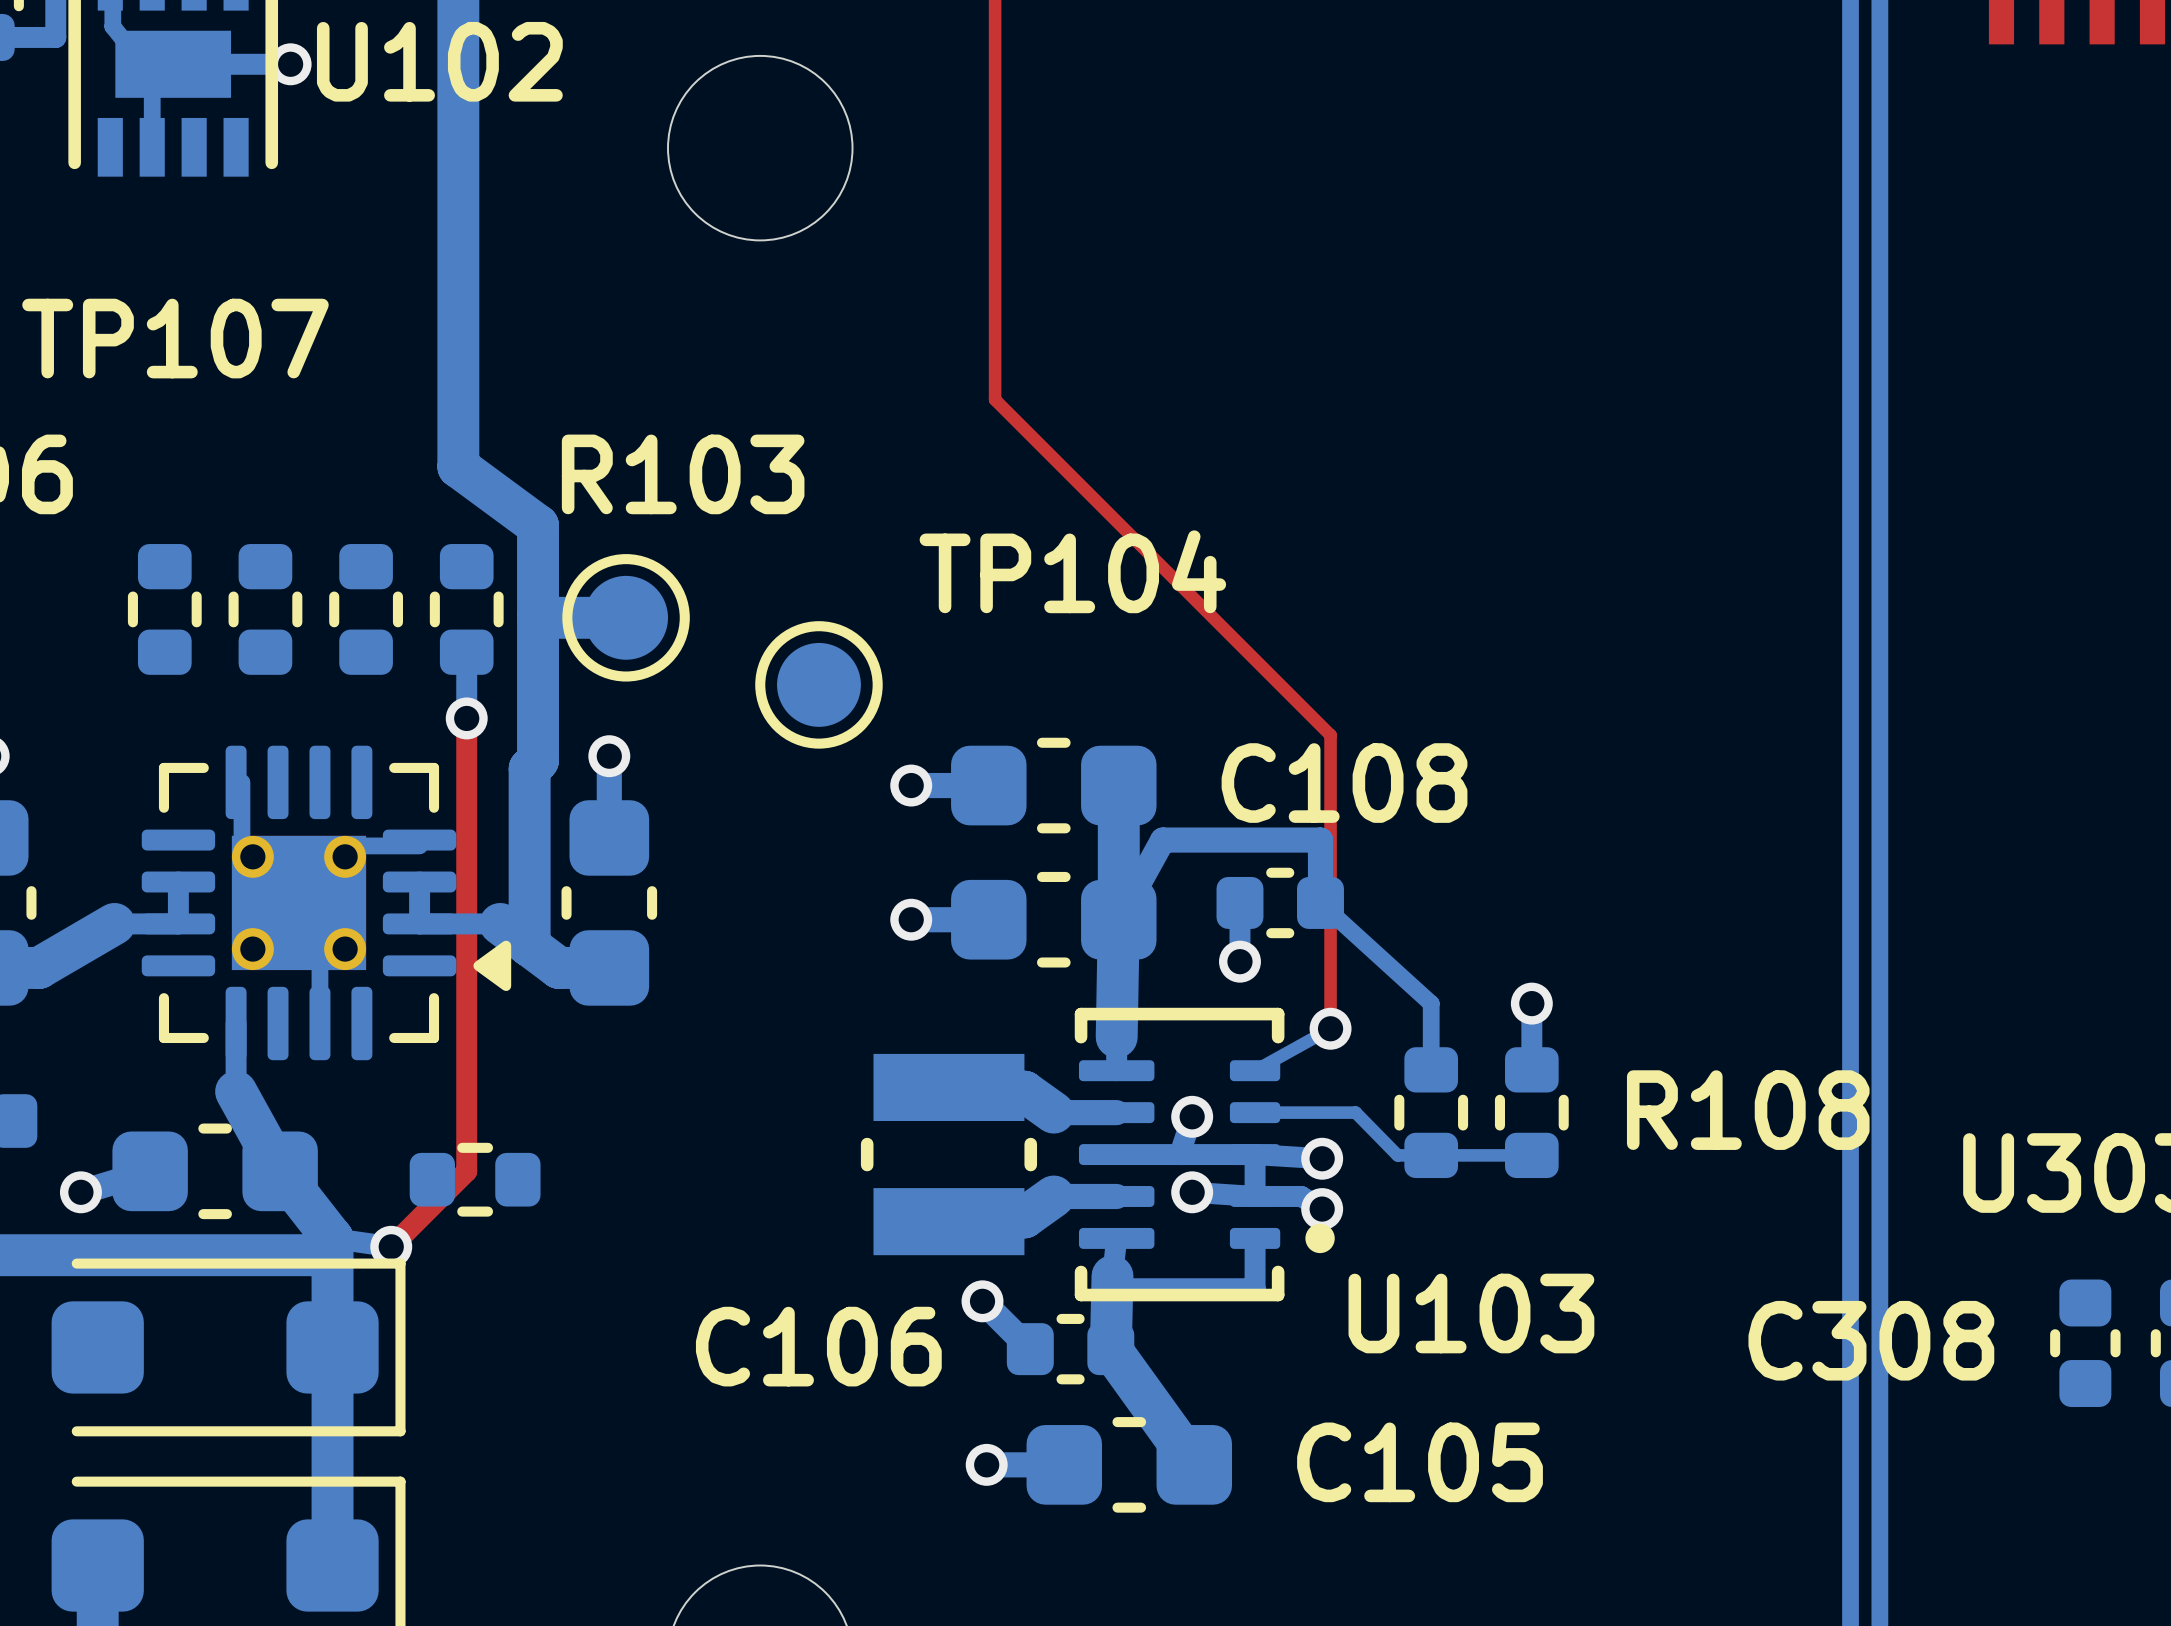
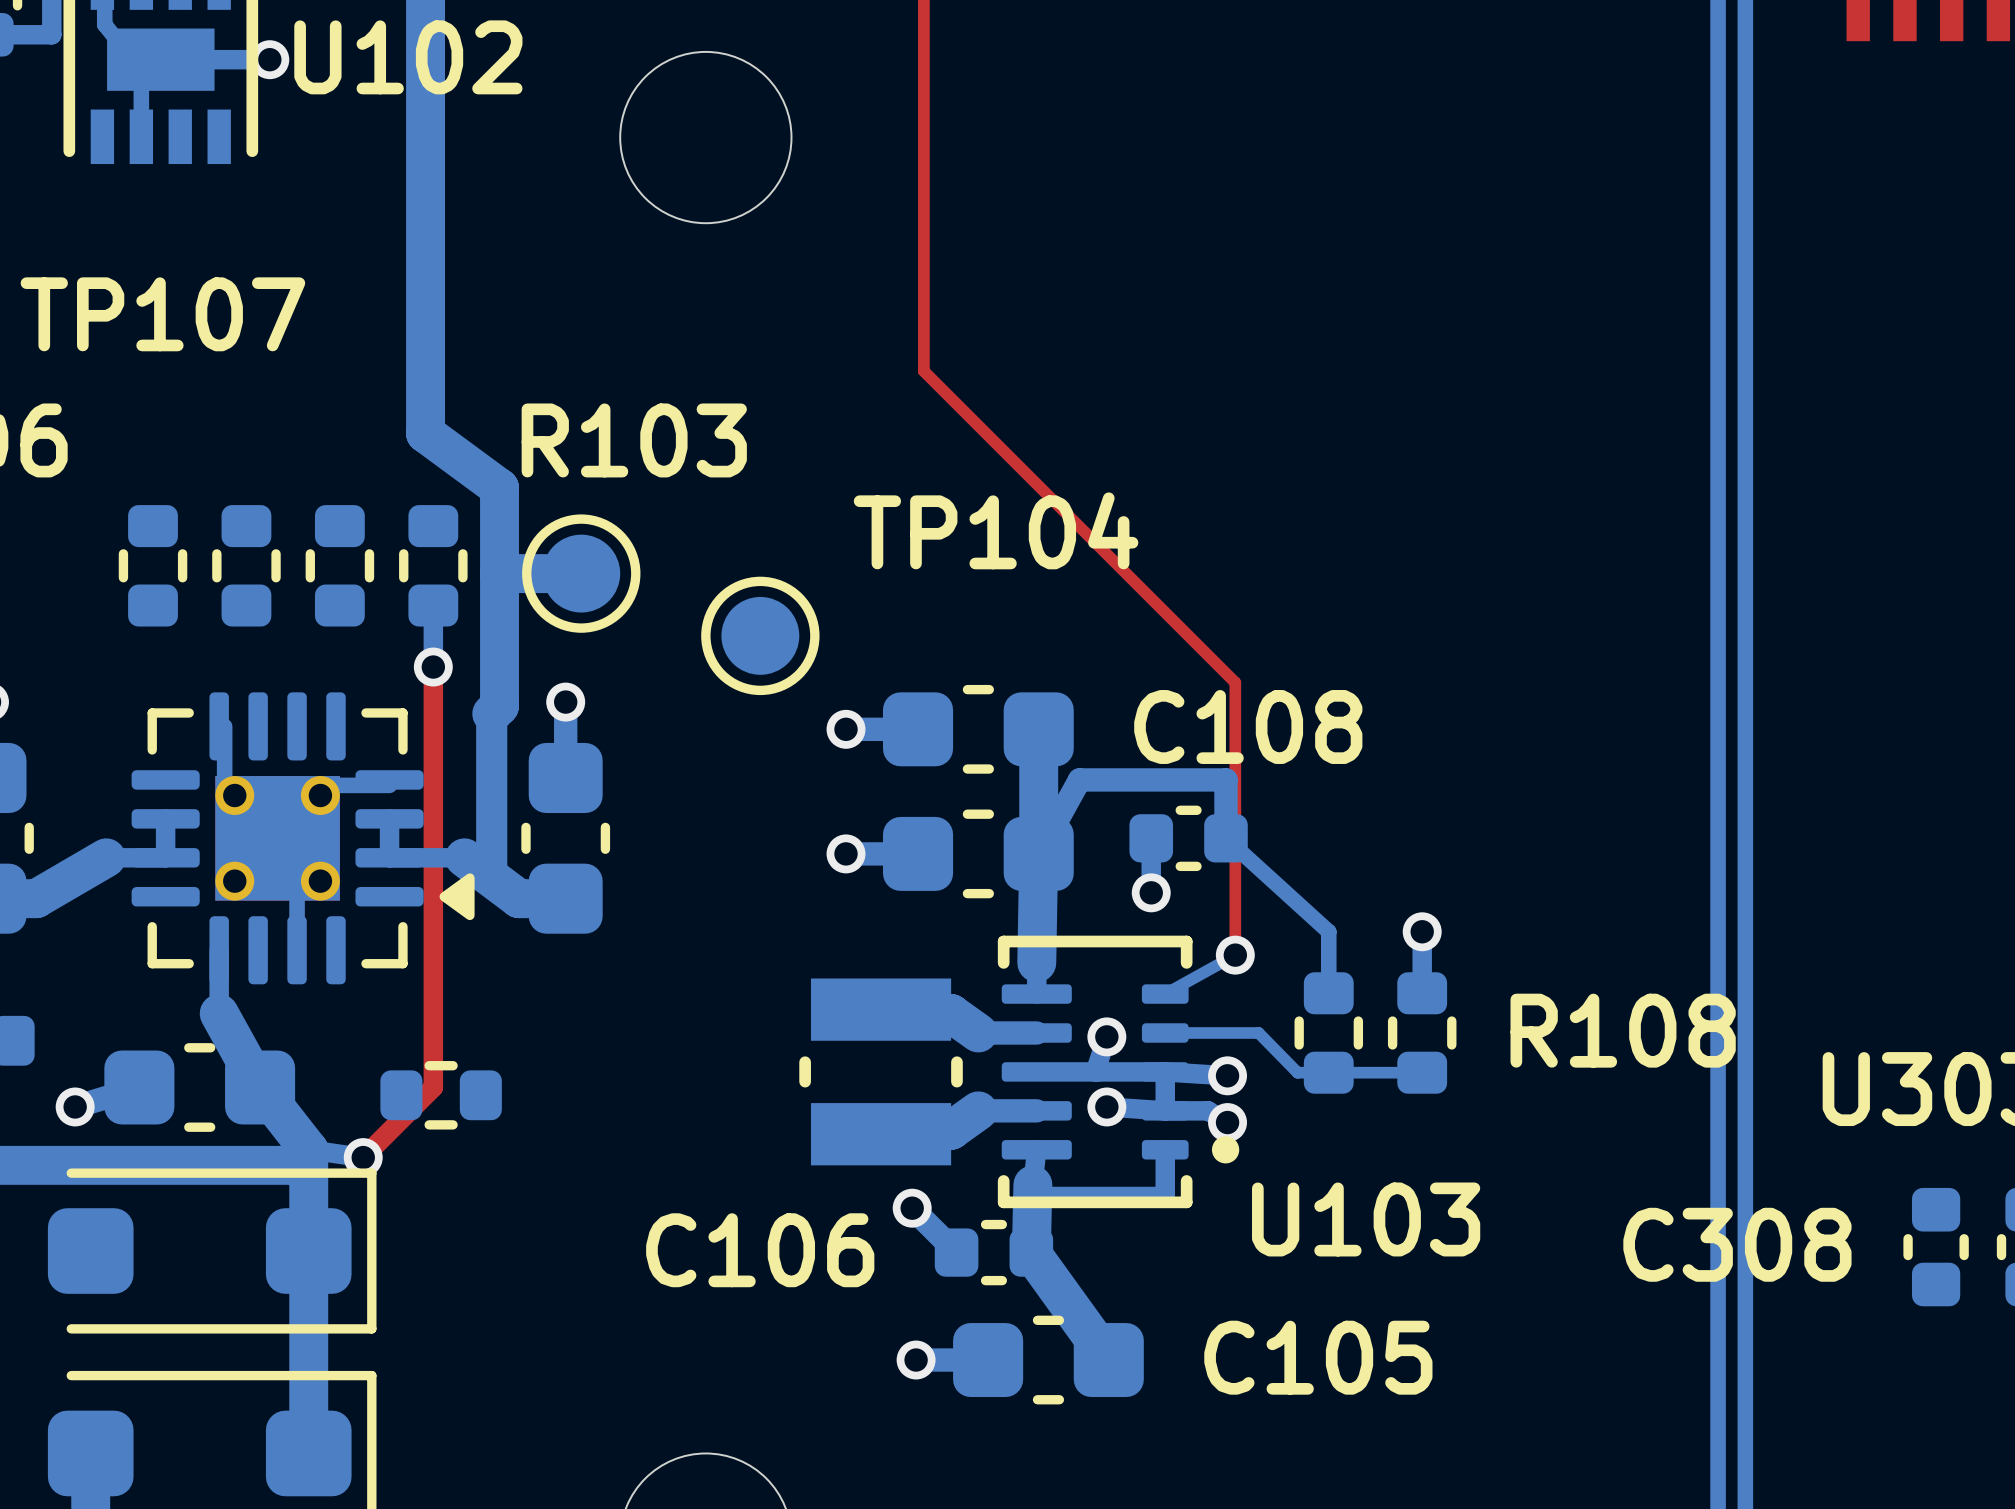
bottom track width: thick (529, 768) (529, 945) -> thin (491, 713) (491, 878)

